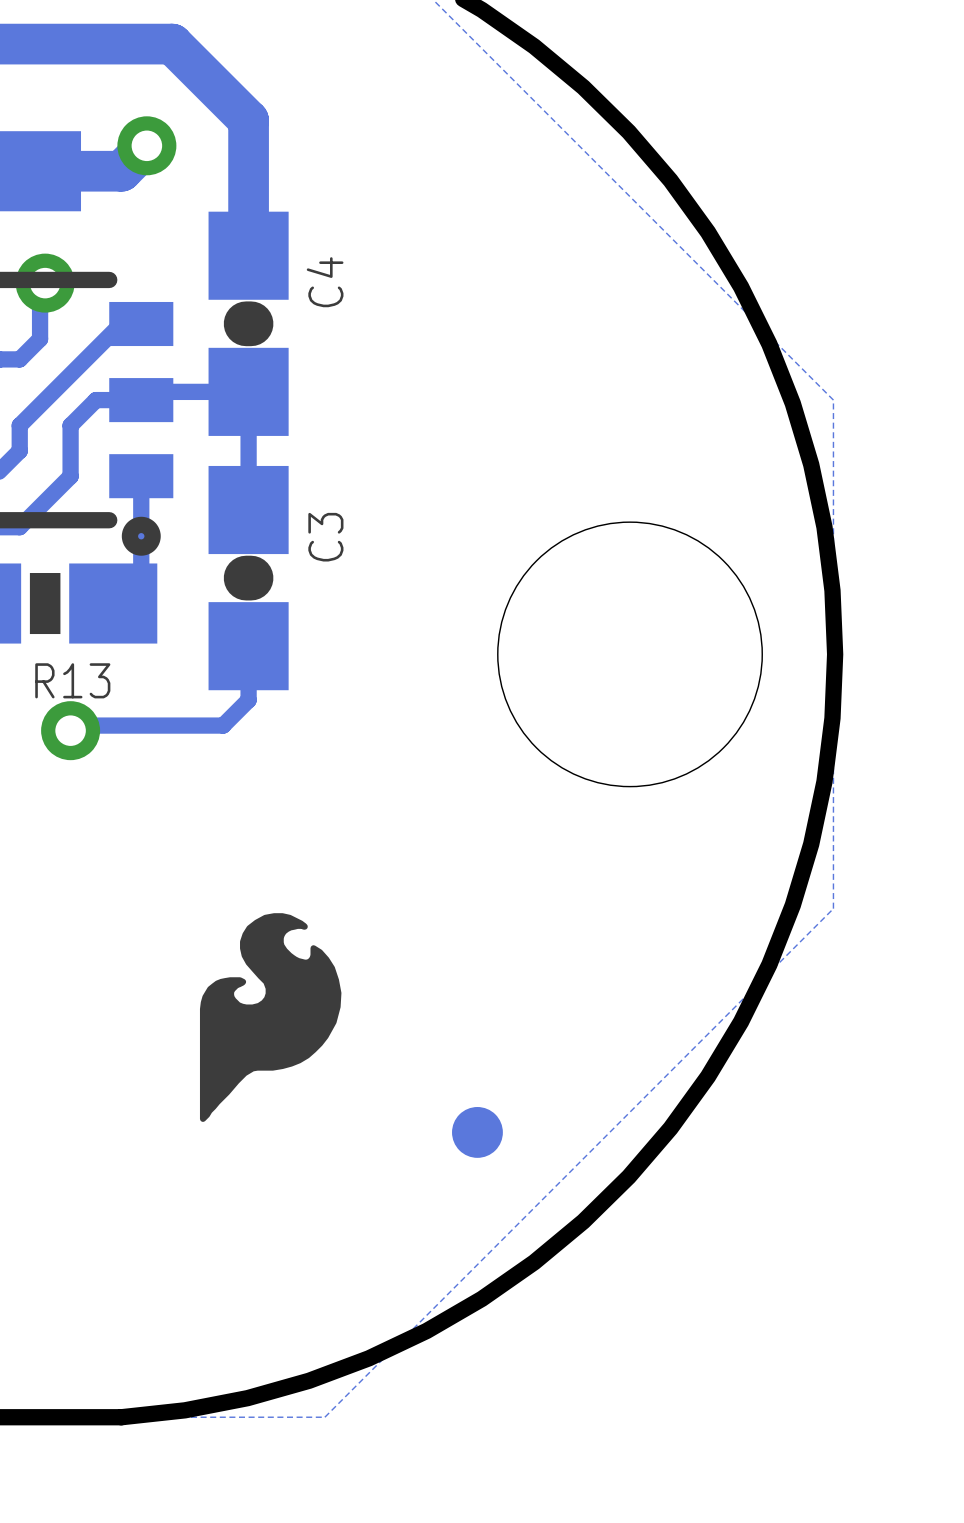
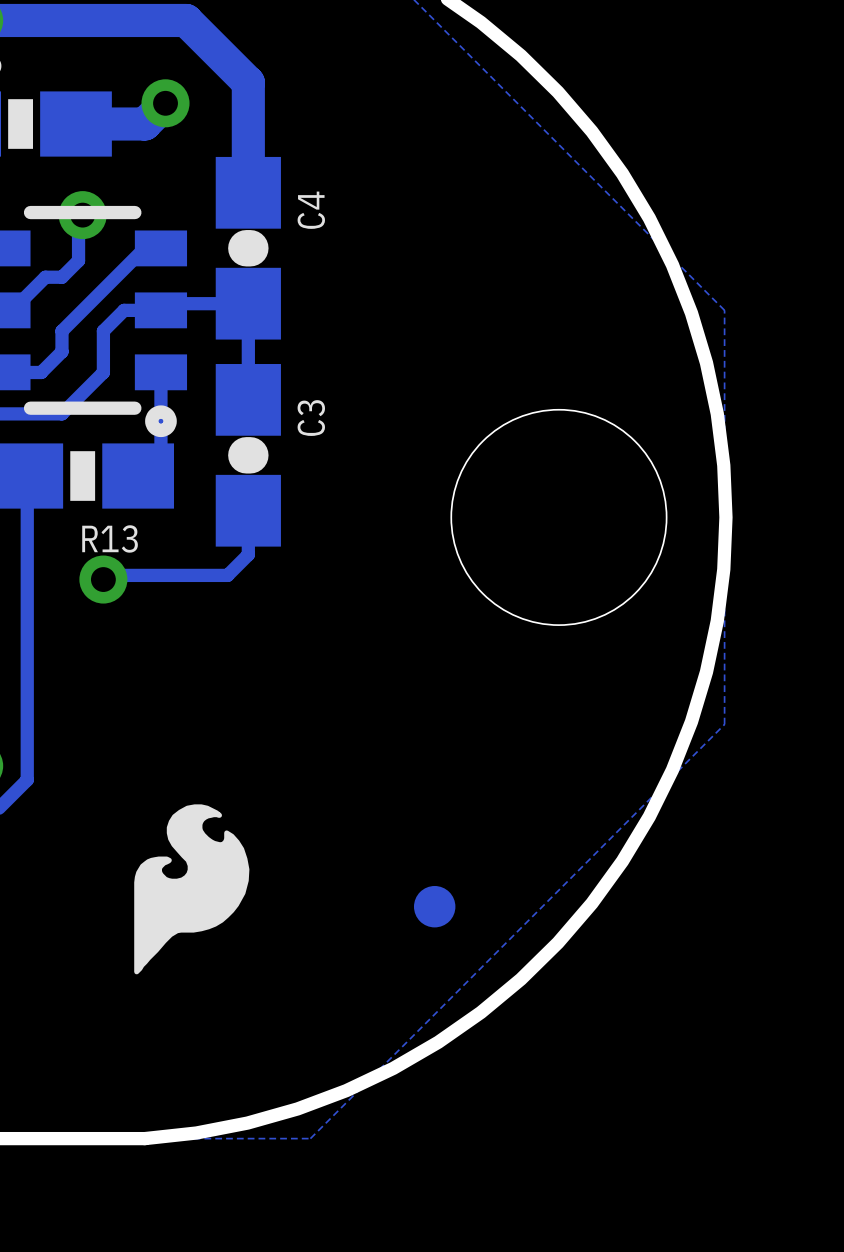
drawing position: (270, 1017) -> (191, 889)

